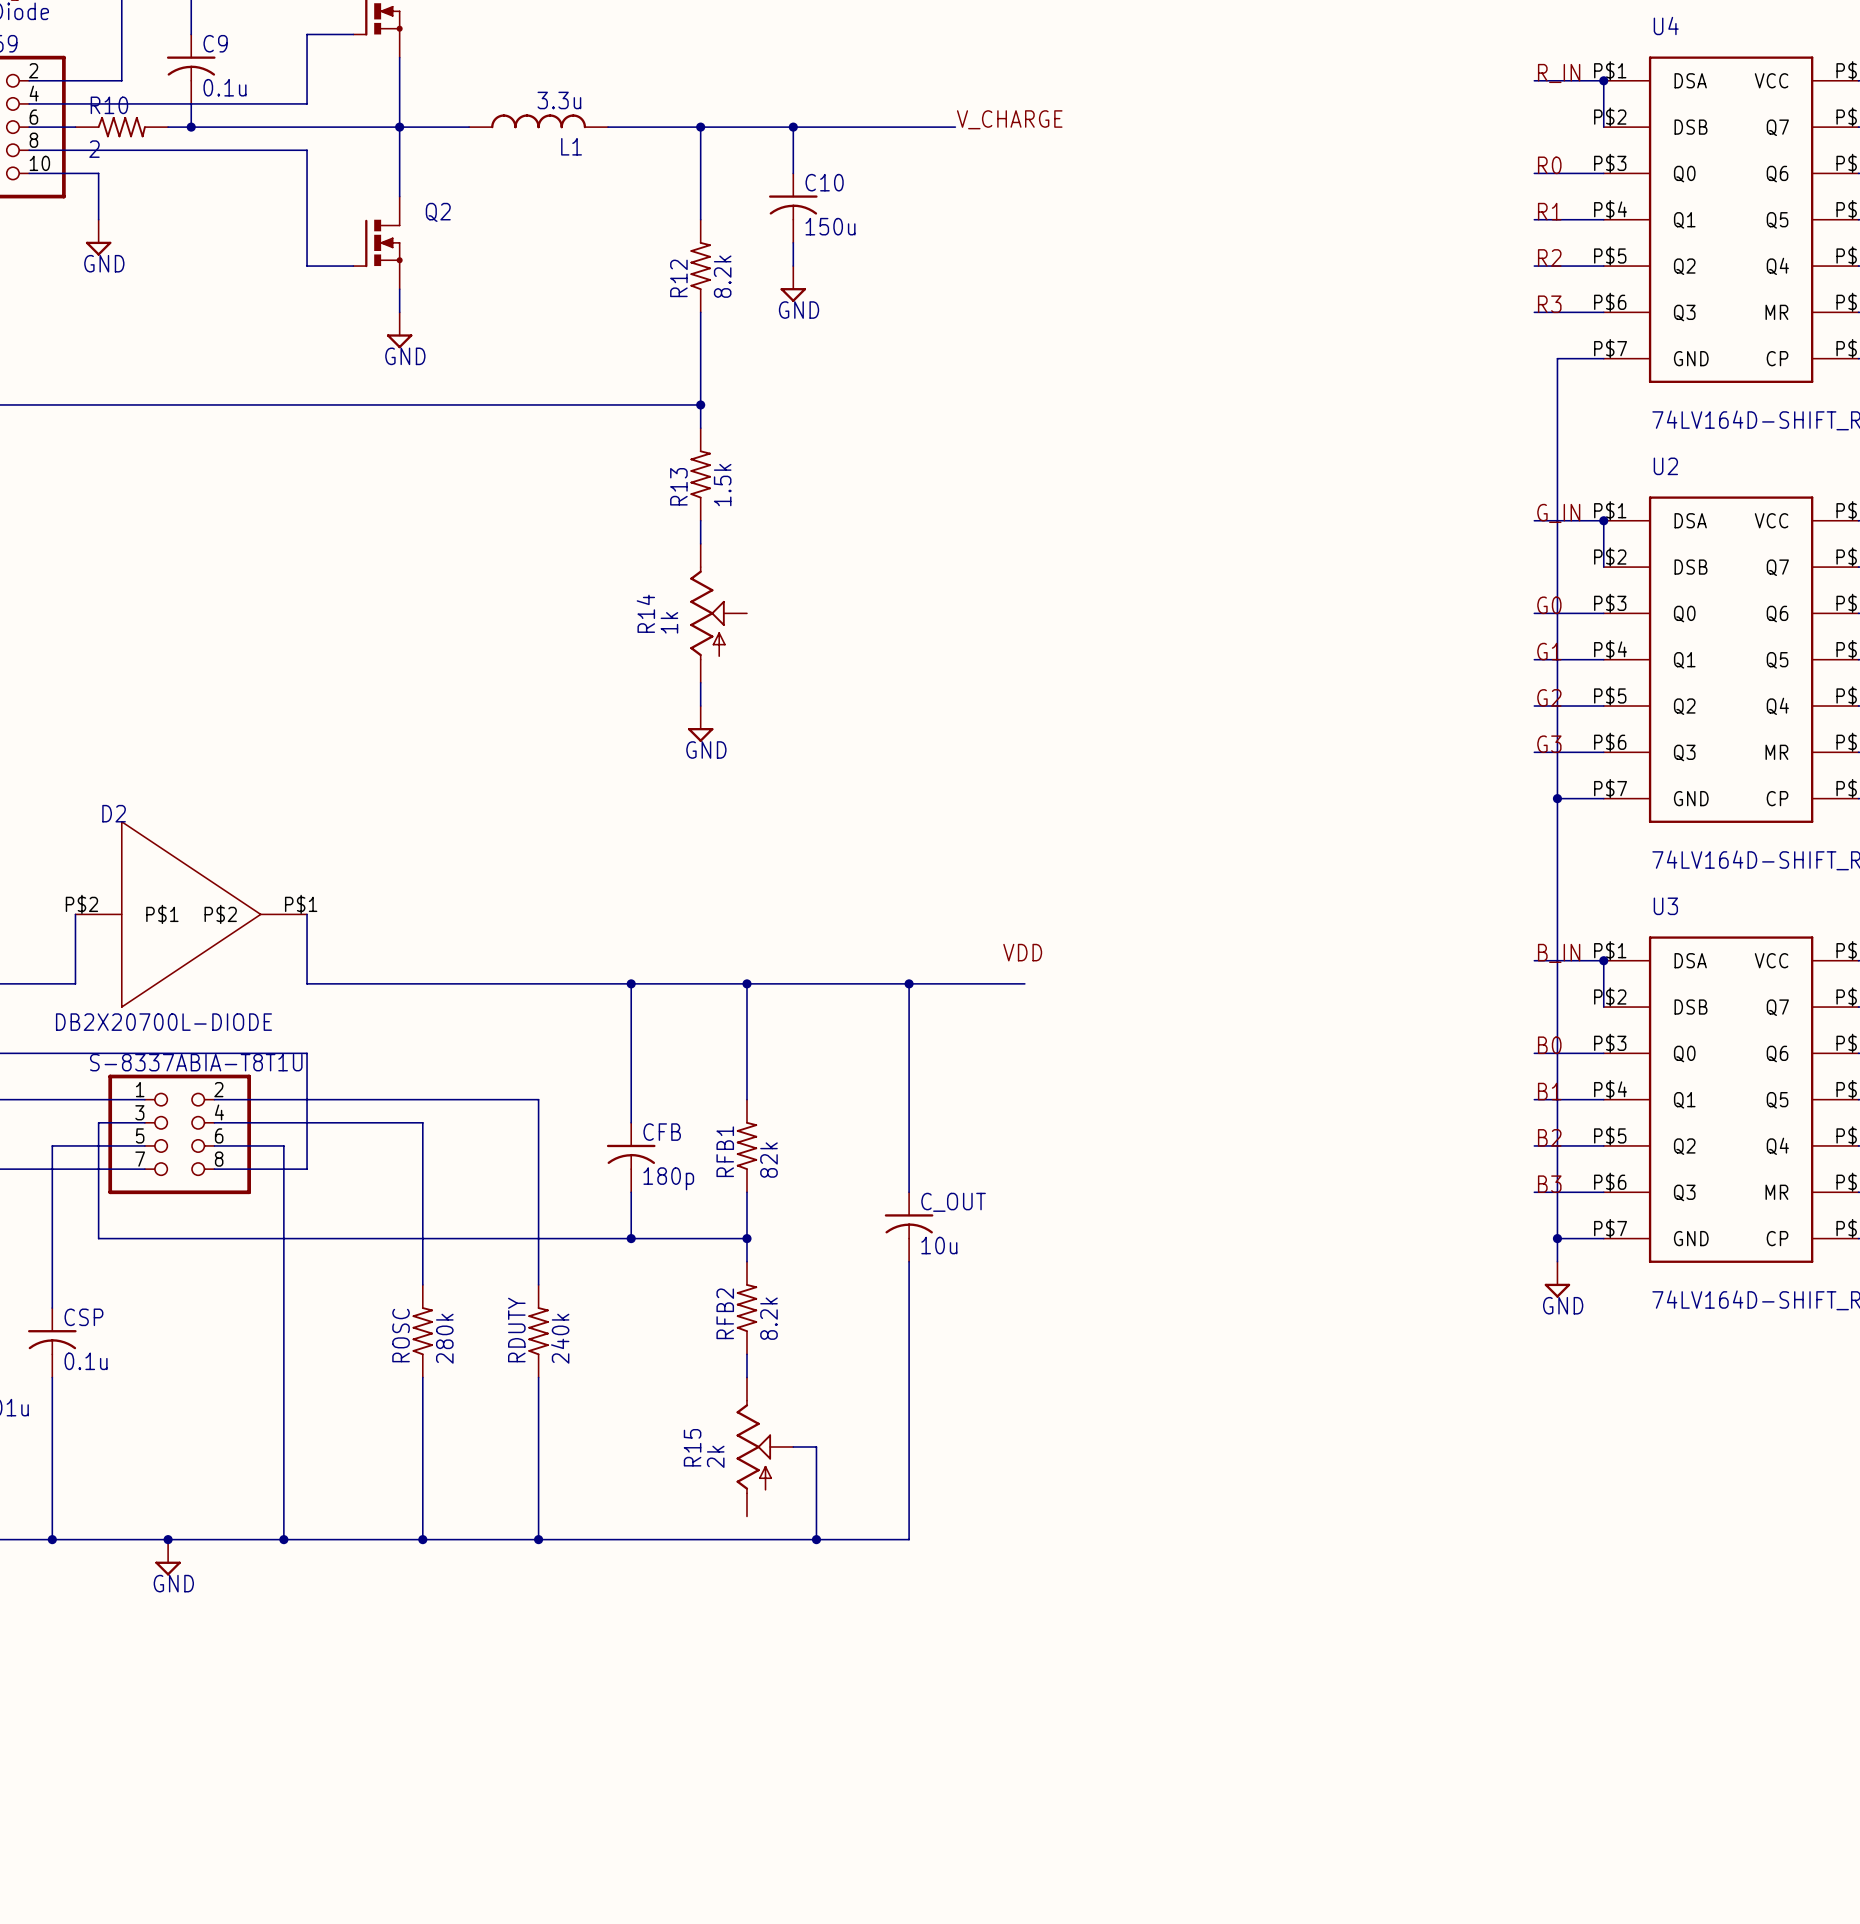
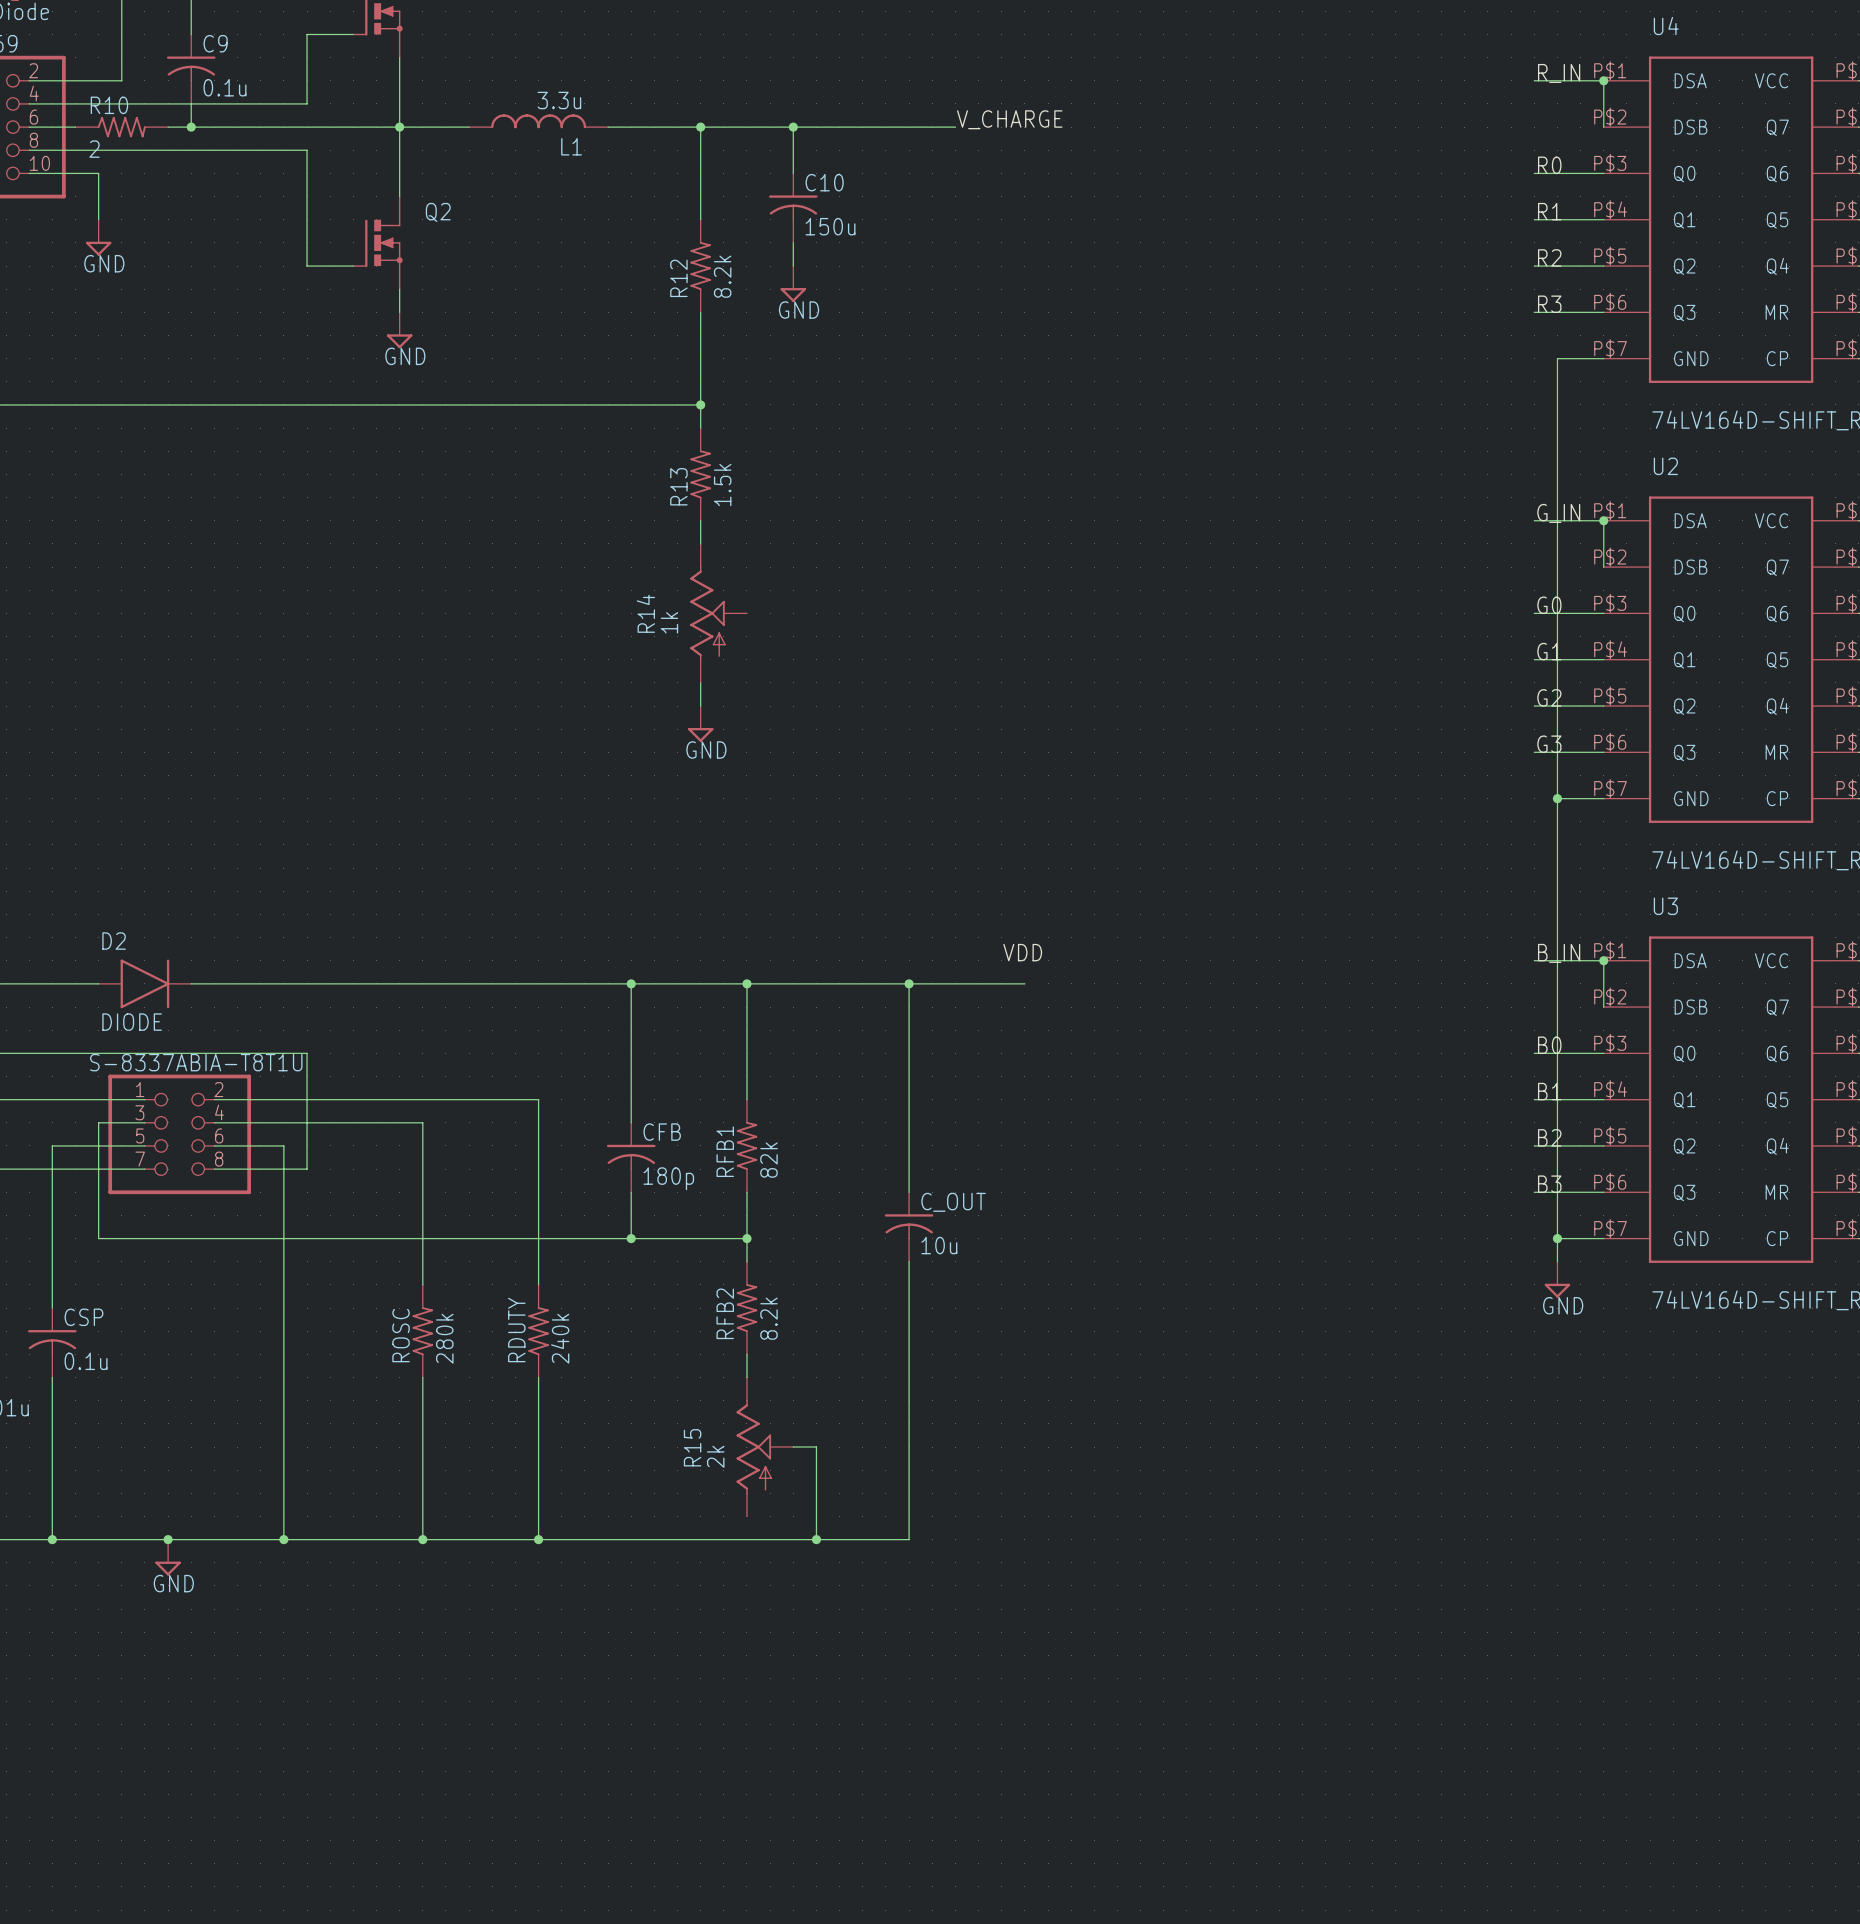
D2 name position: D2 (114, 813) -> D2 (114, 941)
D2 symbol: [75, 821, 308, 1008] -> [98, 959, 192, 1009]
wire: (75, 914) (75, 983) -> (98, 983) (75, 983)
wire: (307, 914) (307, 983) -> (191, 983) (307, 983)
D2 value: DB2X20700L-DIODE (163, 1022) -> DIODE (132, 1022)

